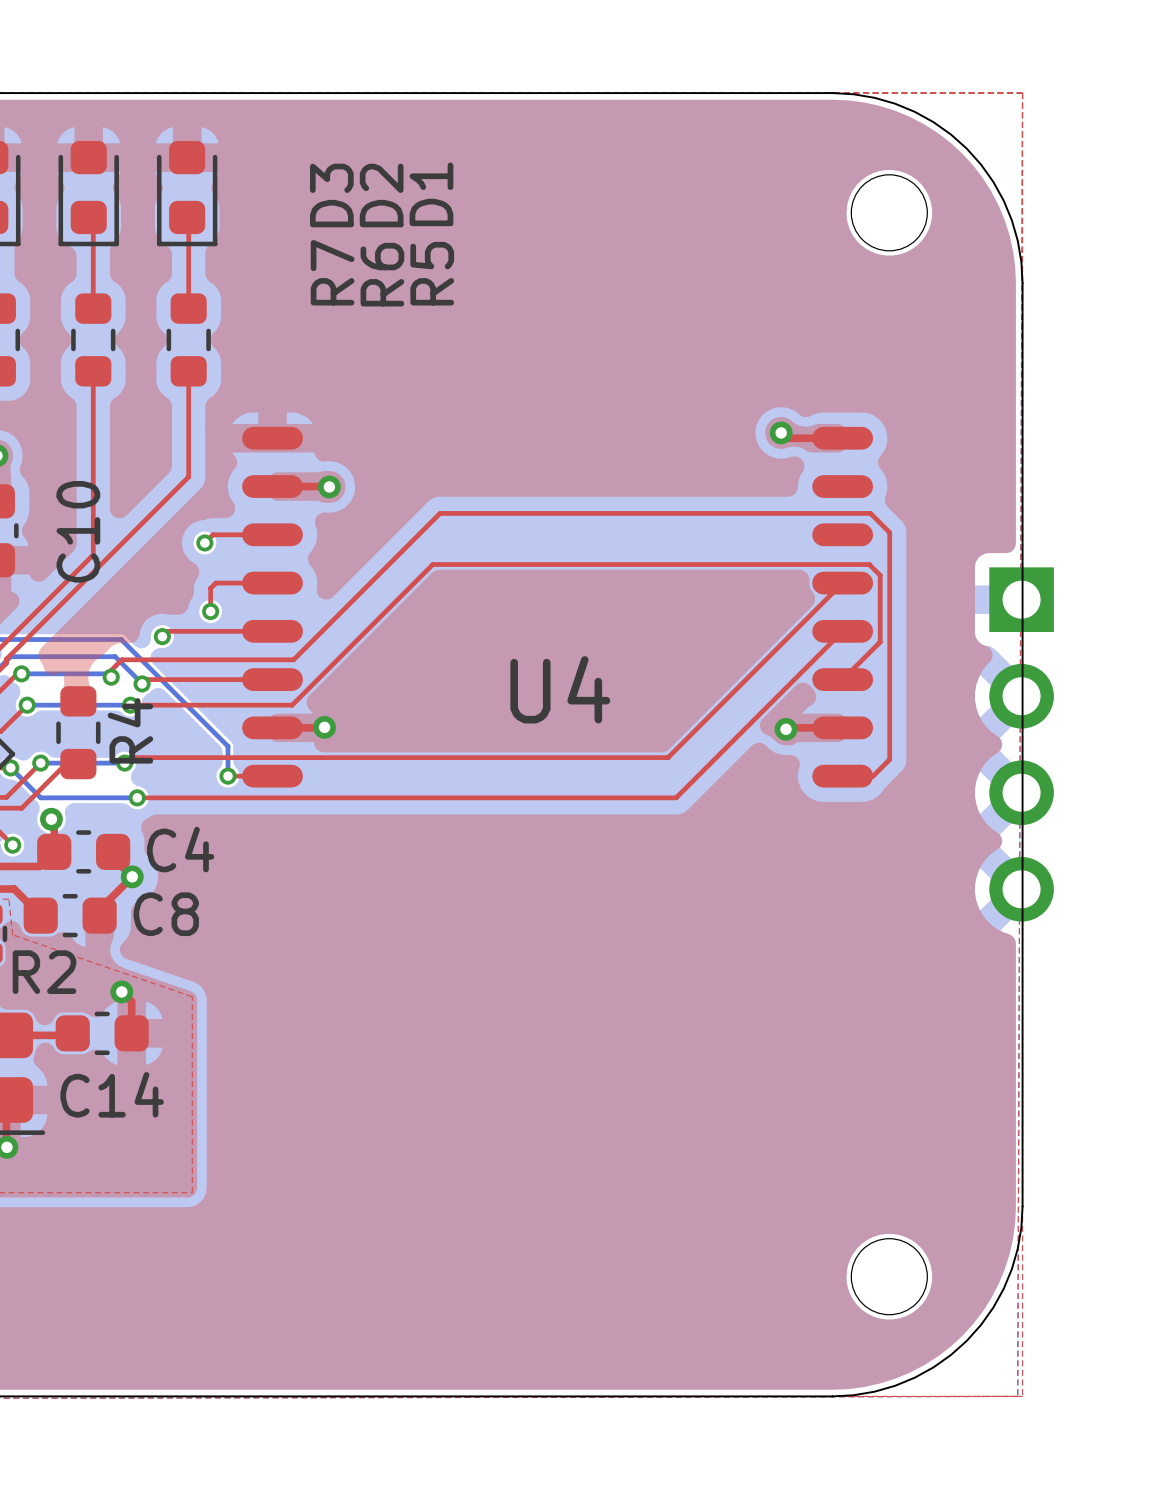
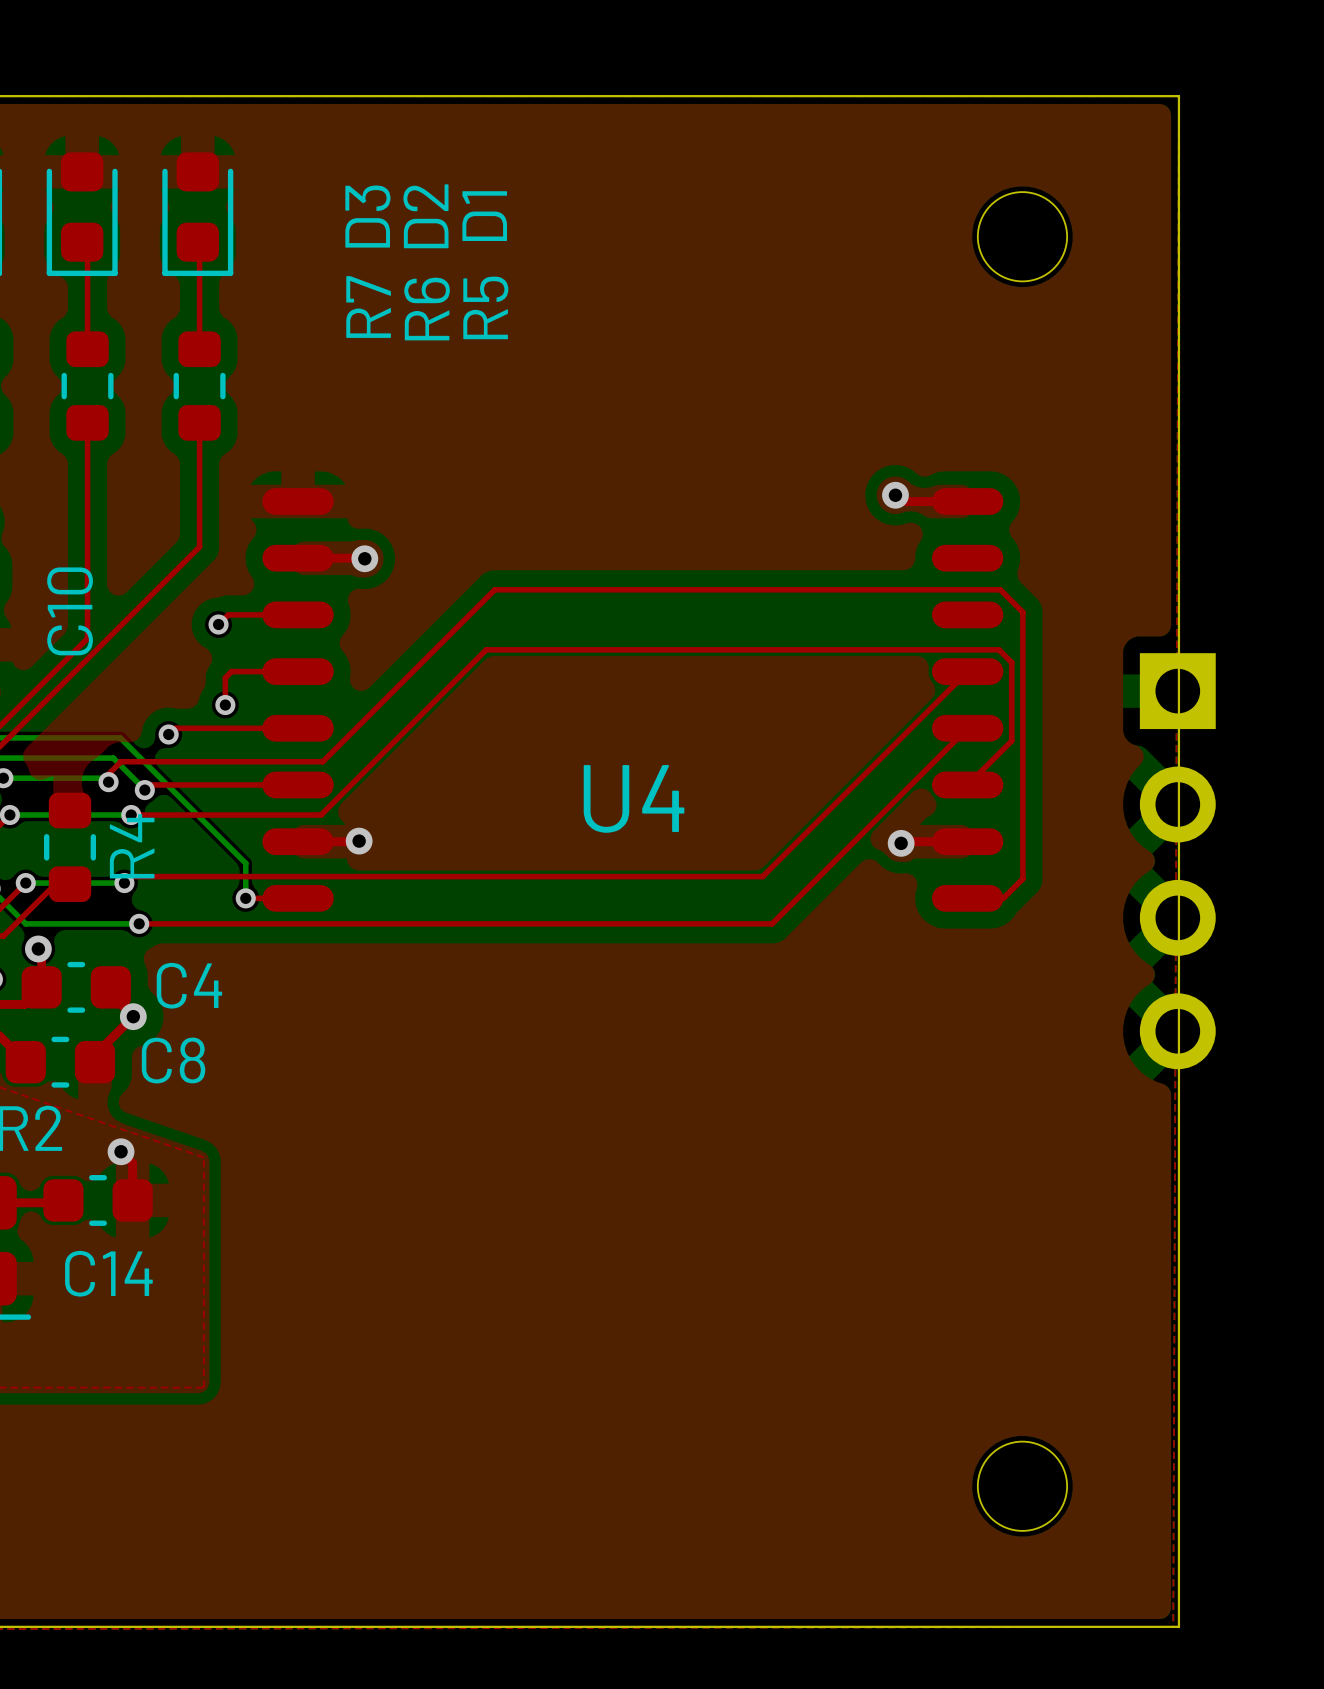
board edge: (832, 93) (874, 97) (914, 111) (933, 122) (966, 148) (993, 182) (1011, 220) (1021, 261) (1022, 283) -> (955, 96) (1178, 96) (1178, 319)
board edge: (1022, 1206) (1021, 1227) (1011, 1269) (993, 1307) (966, 1340) (933, 1367) (895, 1385) (853, 1395) (832, 1396) -> (1178, 1403) (1178, 1626) (955, 1626)

